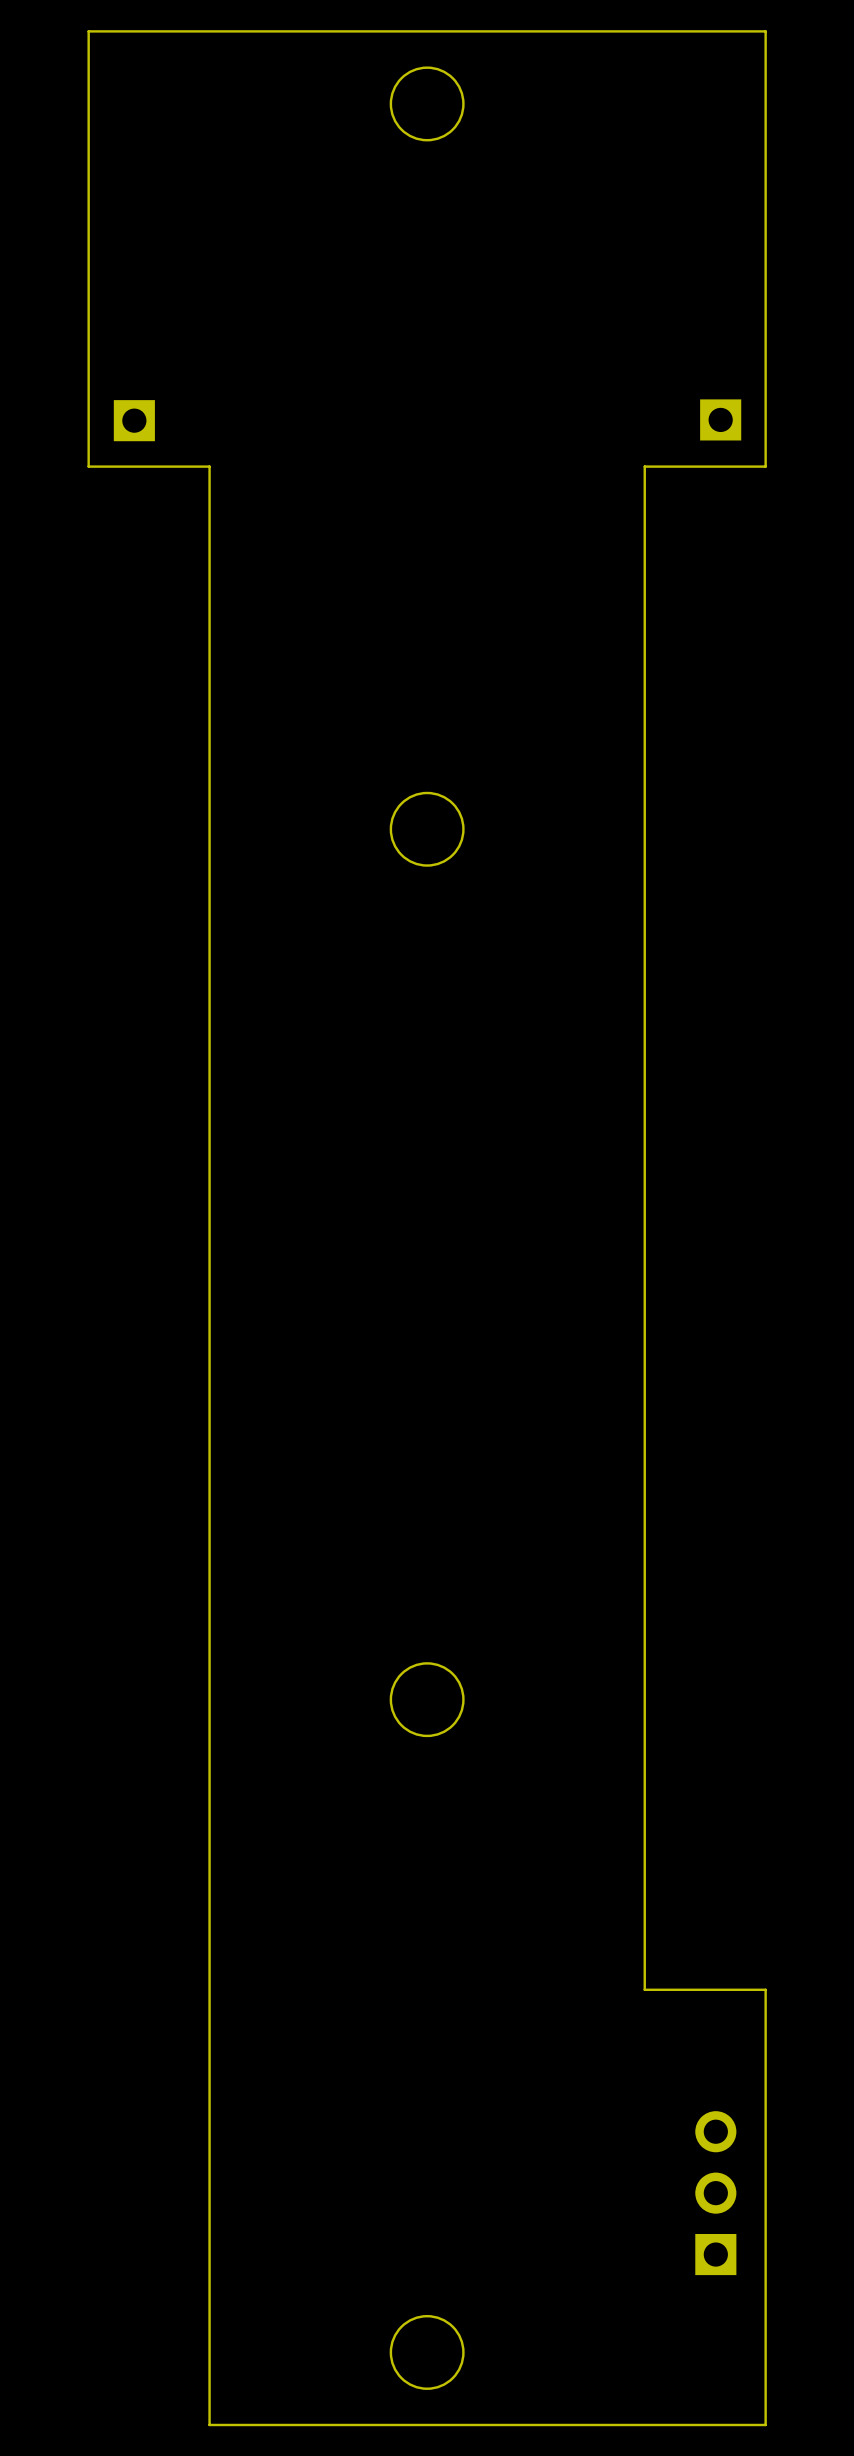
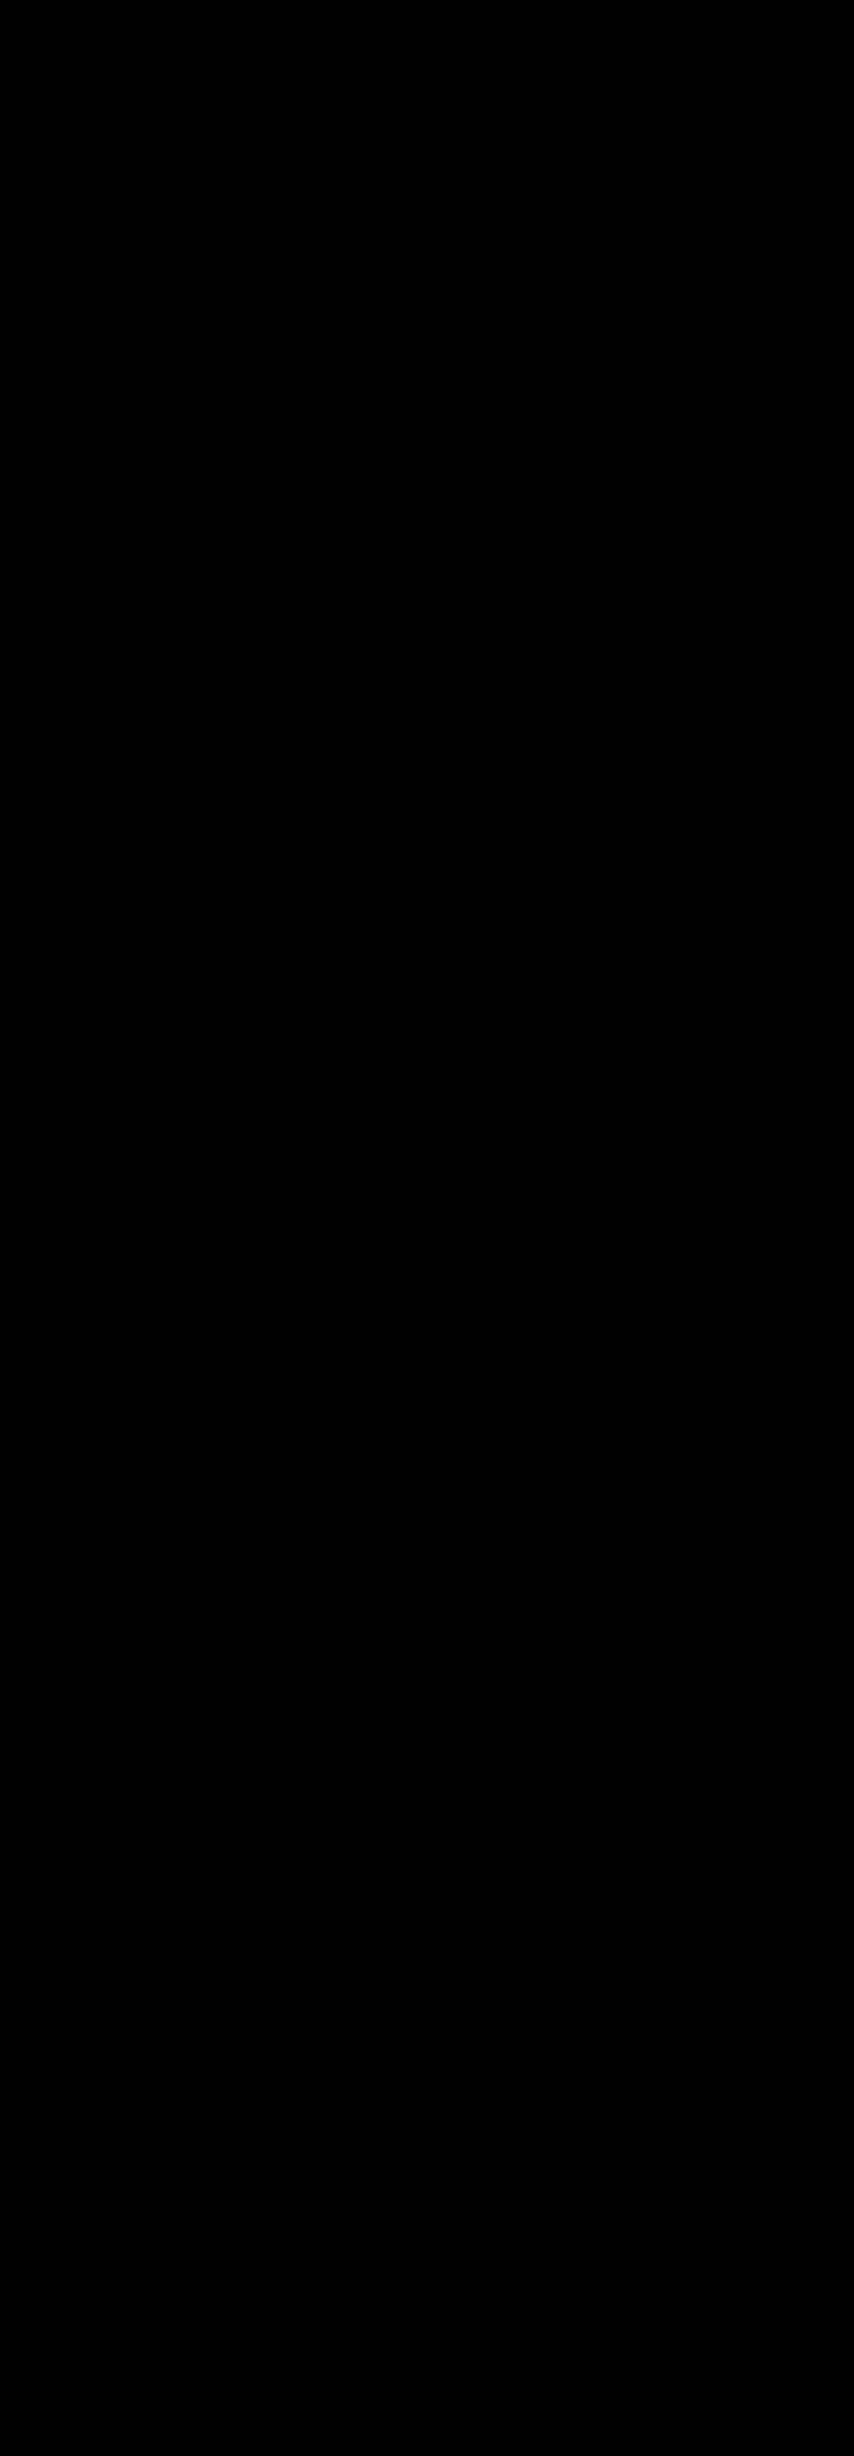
board edge: (765, 31) (765, 466) (644, 466) (644, 1989) (765, 1989) (765, 2424) (209, 2424) (209, 466) (88, 466) (88, 31) (765, 31) -> none
round board edge: [389, 66, 465, 142] -> none
part: (720, 419) -> none
part: (134, 420) -> none
round board edge: [389, 791, 465, 867] -> none
round board edge: [389, 1662, 465, 1738] -> none
part: (715, 2193) -> none
round board edge: [389, 2314, 465, 2390] -> none

